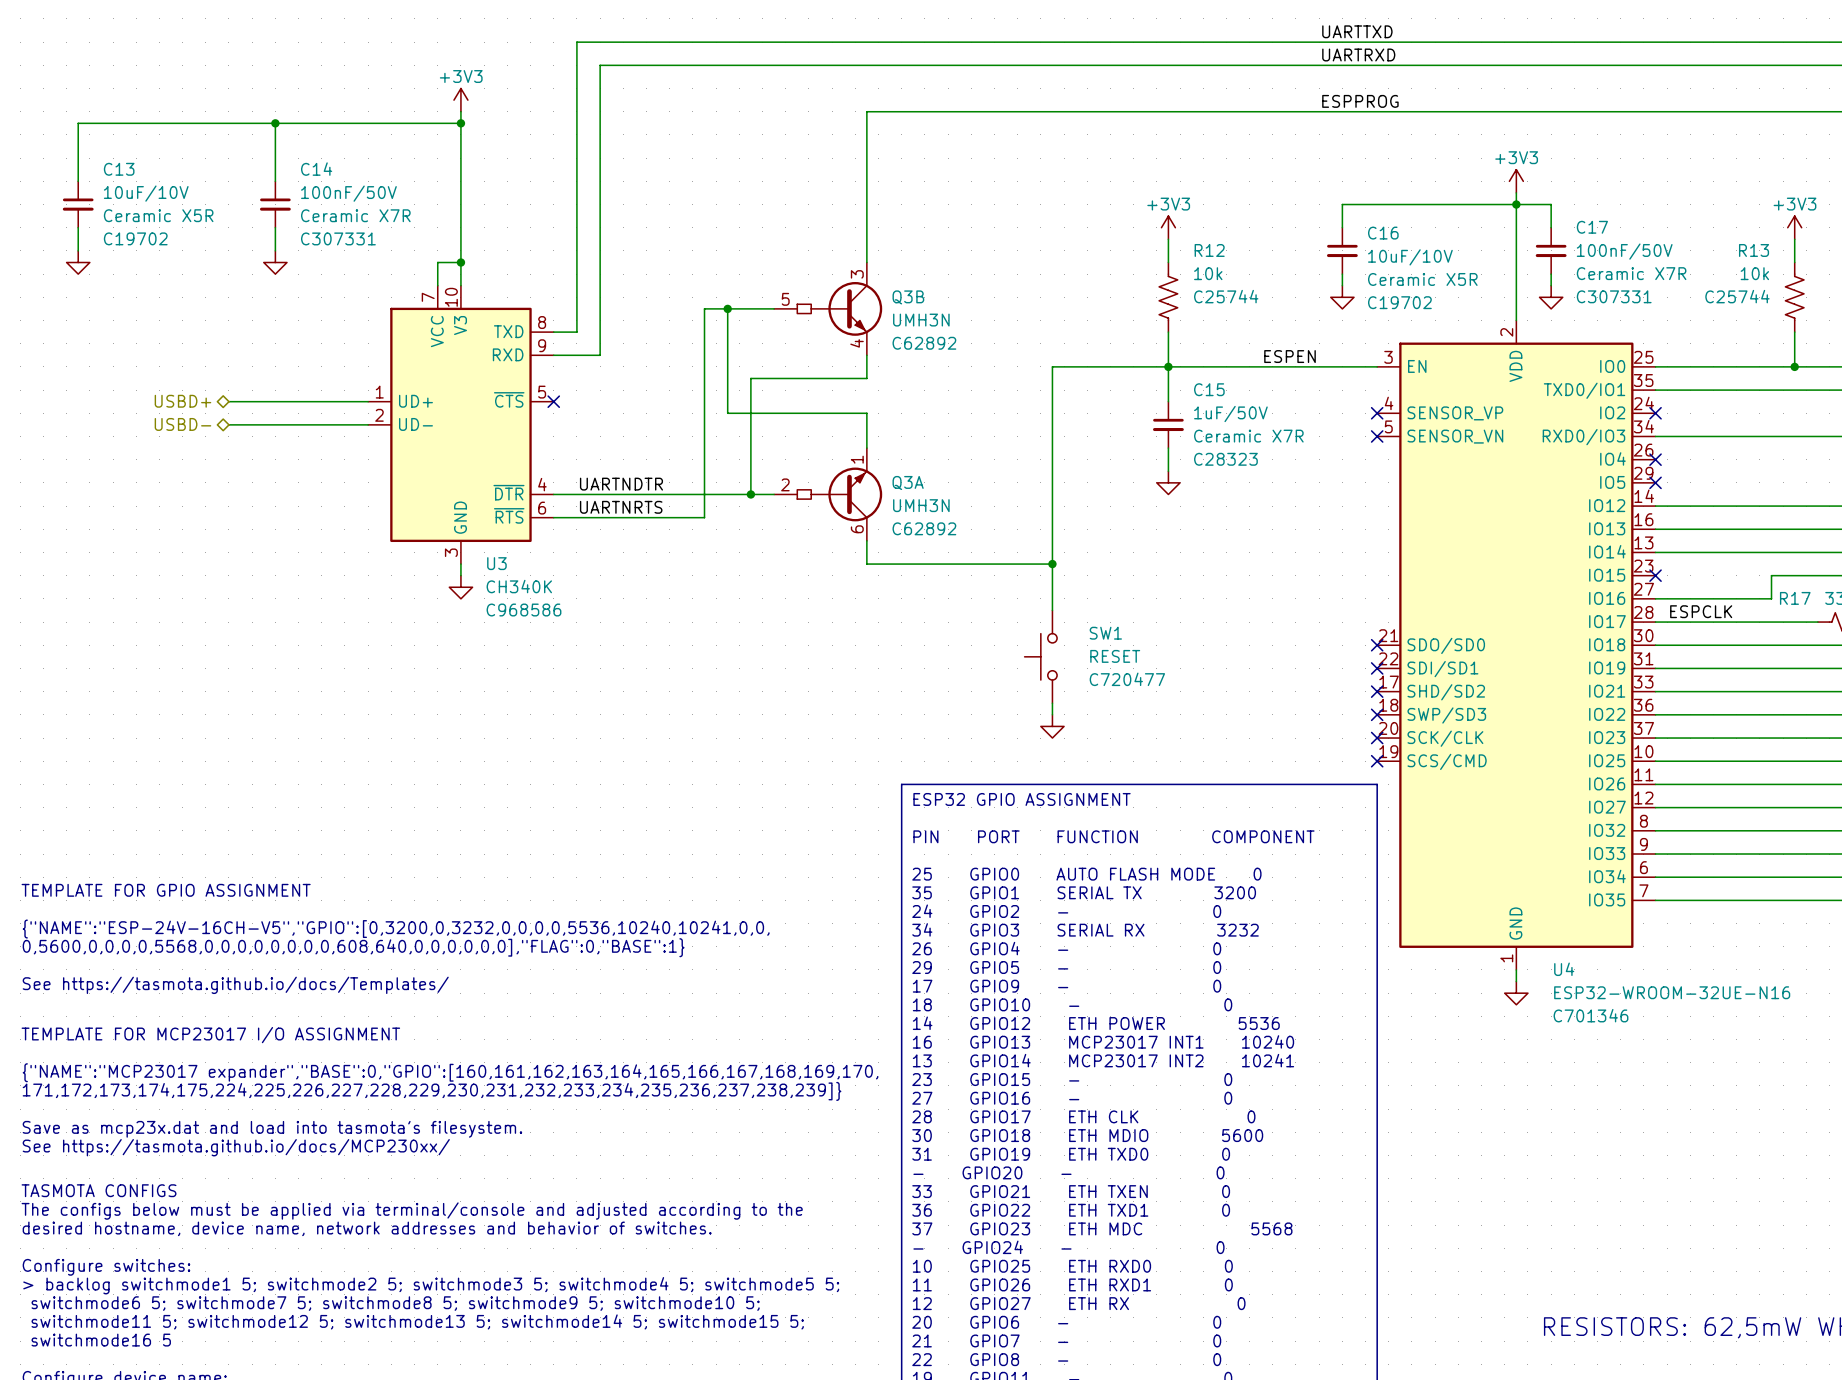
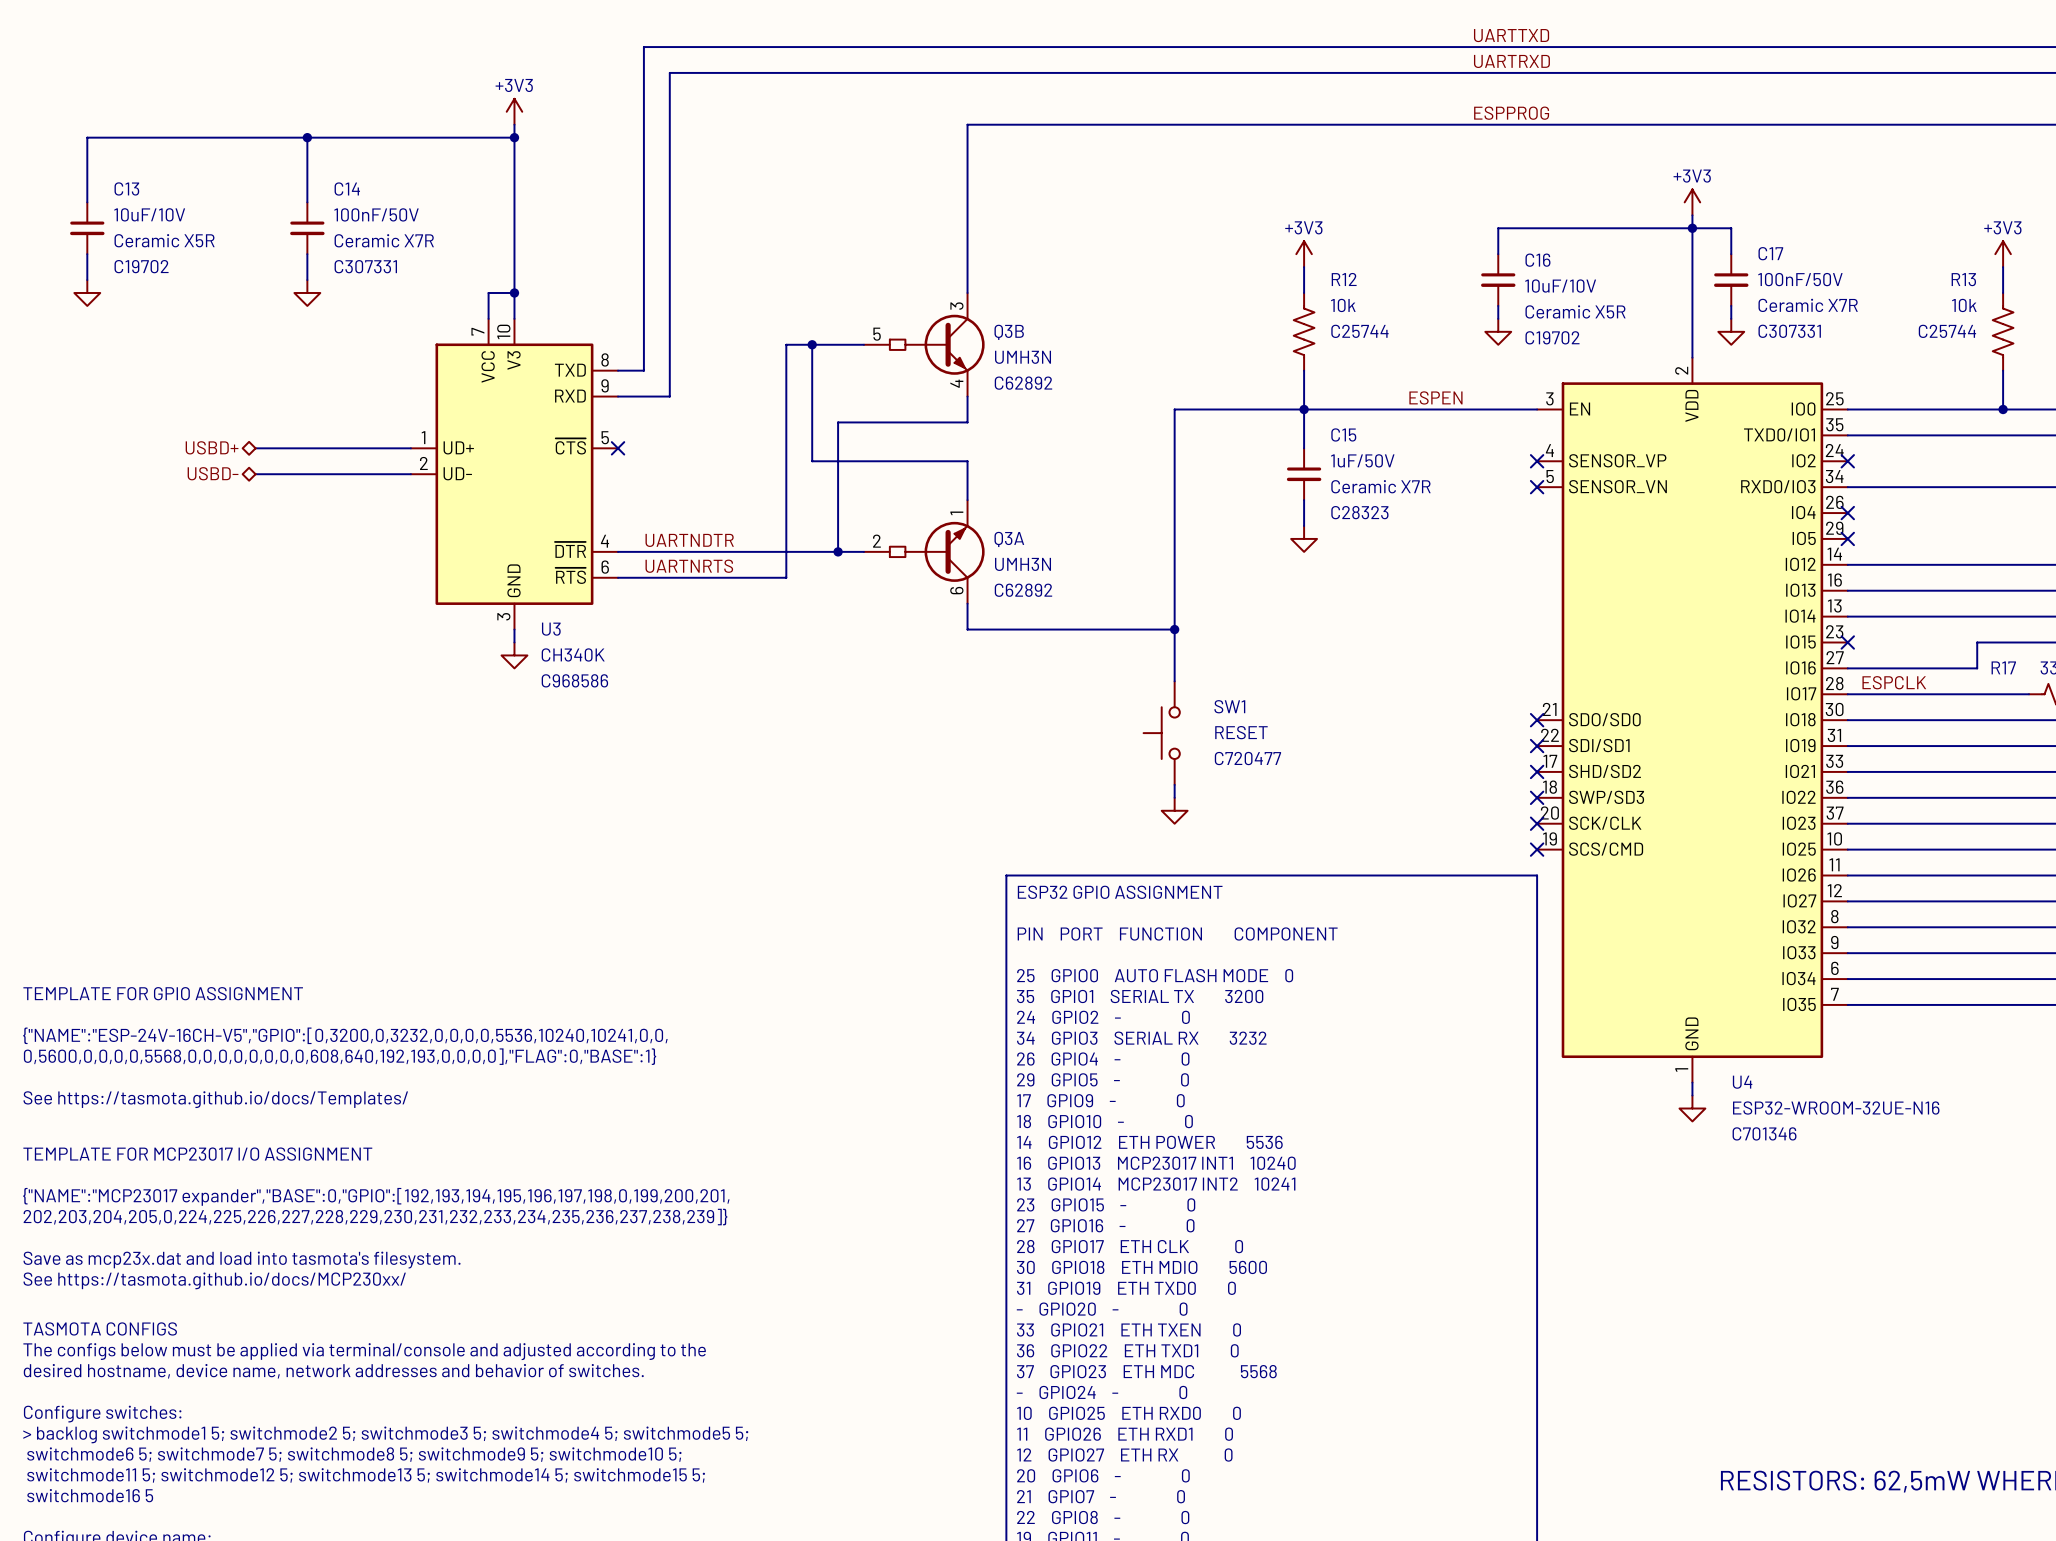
text: 0,5600,0,0,0,0,5568,0,0,0,0,0,0,0,0,608,640,0,0,0,0,0,0],"FLAG":0,"BASE":1} (353, 947) -> 0,5600,0,0,0,0,5568,0,0,0,0,0,0,0,0,608,640,192,193,0,0,0,0],"FLAG":0,"BASE":1} (340, 1056)
text: {"NAME":"MCP23017 expander","BASE":0,"GPIO":[160,161,162,163,164,165,166,167,168,169,170, (450, 1072) -> {"NAME":"MCP23017 expander","BASE":0,"GPIO":[192,193,194,195,196,197,198,0,199,200,201, (376, 1196)
text: 171,172,173,174,175,224,225,226,227,228,229,230,231,232,233,234,235,236,237,238,239]} (432, 1091) -> 202,203,204,205,0,224,225,226,227,228,229,230,231,232,233,234,235,236,237,238,239]} (375, 1217)

